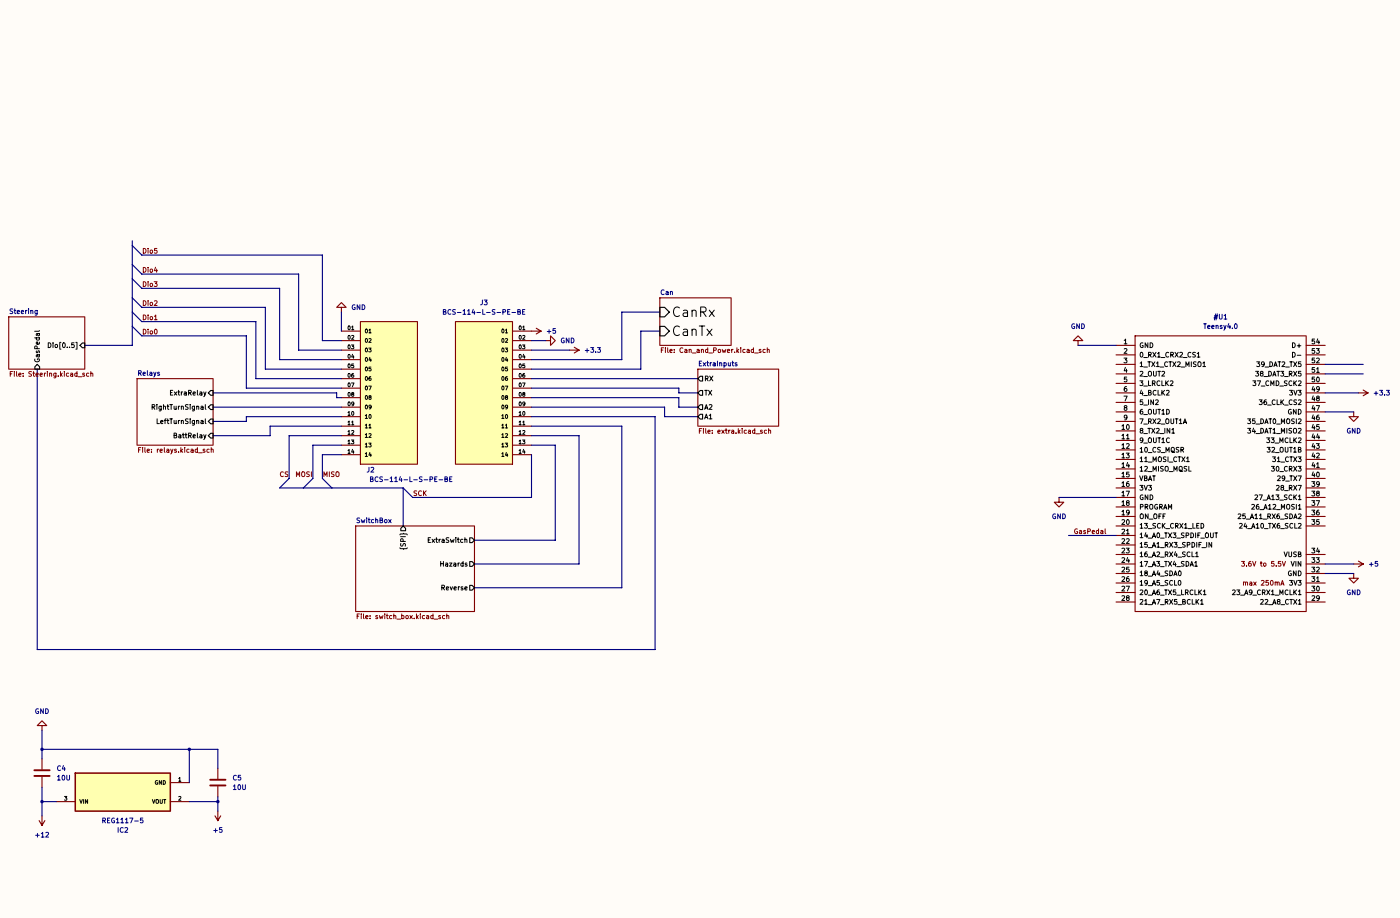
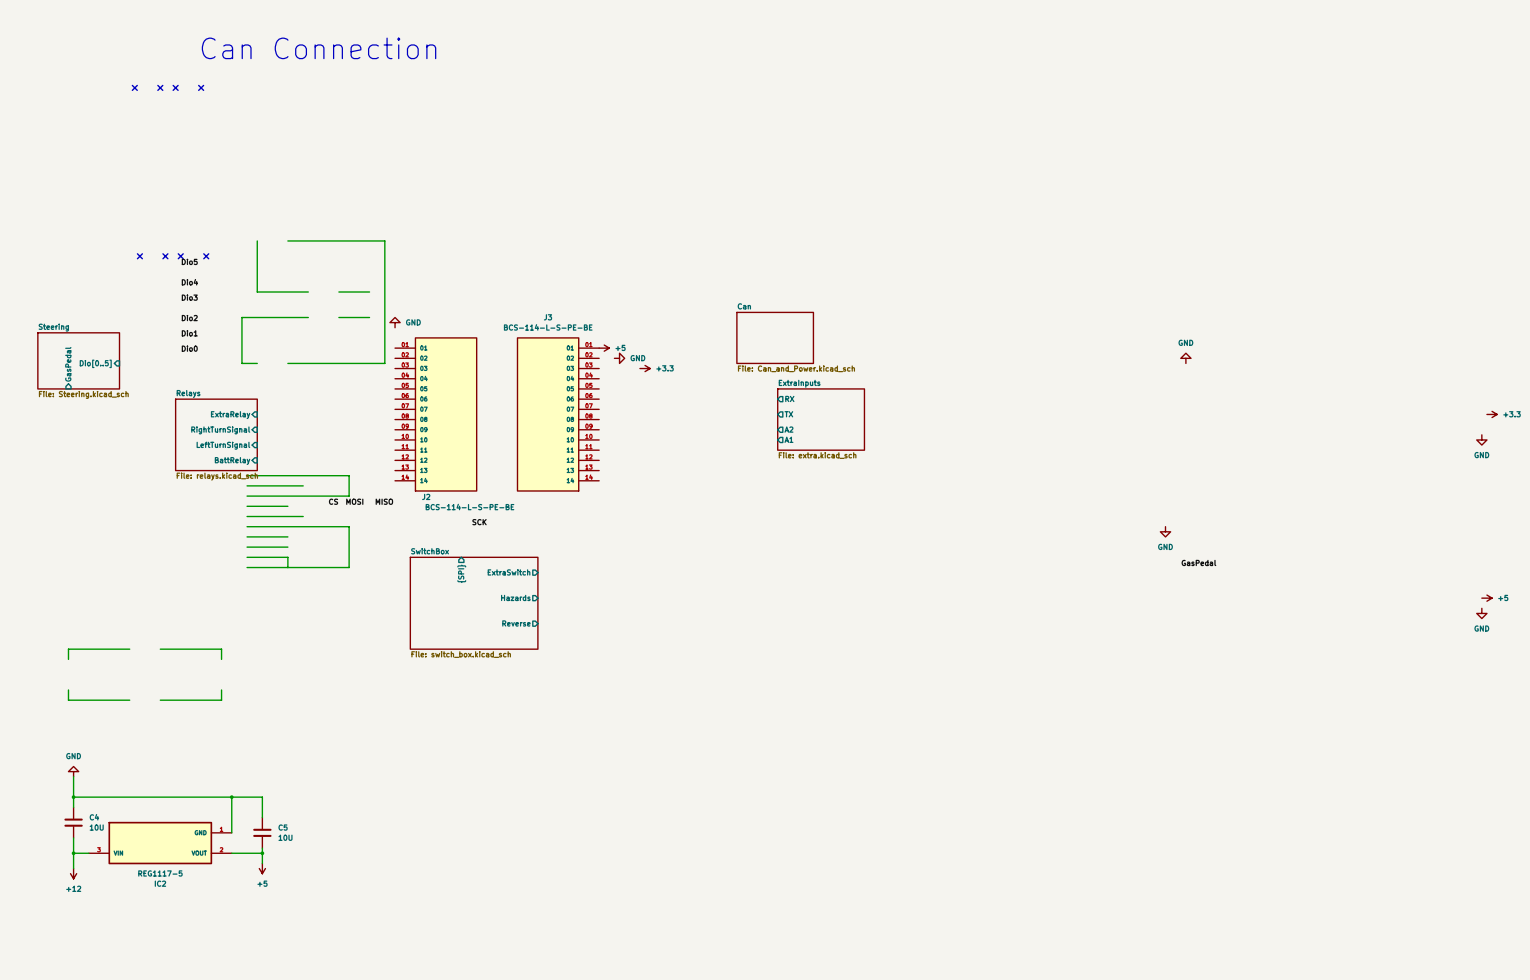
text: none -> Can Connection (319, 48)
no-connect mark: none -> (134, 87)
no-connect mark: none -> (160, 87)
no-connect mark: none -> (175, 87)
no-connect mark: none -> (201, 87)
wire: none -> (257, 240) (257, 292) (308, 292)
wire: none -> (287, 240) (384, 240) (384, 363) (287, 363)
bus: (132, 240) (132, 345) (84, 345) -> none
no-connect mark: none -> (139, 256)
no-connect mark: none -> (165, 256)
wire: (132, 245) (141, 255) (322, 255) (322, 340) (341, 340) -> none
no-connect mark: none -> (180, 256)
no-connect mark: none -> (206, 256)
wire: (132, 264) (141, 274) (298, 274) (298, 350) (341, 350) -> none
wire: (132, 278) (141, 288) (279, 288) (279, 359) (341, 359) -> none
wire: none -> (338, 292) (369, 292)
wire: (132, 297) (141, 307) (265, 307) (265, 369) (341, 369) -> none
wire: none -> (308, 317) (241, 317) (241, 363) (257, 363)
wire: none -> (338, 317) (369, 317)
sheet pin: CanRx (693, 311) -> none
wire: (132, 312) (141, 321) (255, 321) (255, 378) (341, 378) -> none
wire: (341, 312) (341, 331) -> none
wire: (659, 312) (621, 312) (621, 359) (531, 359) -> none
wire: (132, 326) (141, 335) (246, 335) (246, 388) (341, 388) -> none
sheet pin: CanTx (692, 330) -> none
wire: (659, 331) (640, 331) (640, 369) (531, 369) -> none
drawing: [1116, 335, 1326, 612] -> none
wire: (531, 340) (545, 340) -> none
wire: (1078, 345) (1116, 345) -> none
wire: (531, 350) (569, 350) -> none
wire: (1325, 364) (1363, 364) -> none
wire: (37, 369) (37, 611) -> (129, 649) (68, 649)
wire: (1325, 373) (1363, 373) -> none
wire: (531, 378) (697, 378) -> none
wire: (531, 388) (678, 388) (678, 392) (697, 392) -> none
wire: (213, 392) (336, 392) (336, 397) (341, 397) -> none
wire: (1325, 392) (1358, 392) -> none
wire: (531, 397) (678, 397) (678, 407) (697, 407) -> none
wire: (213, 407) (341, 407) -> none
wire: (531, 407) (664, 407) (664, 416) (697, 416) -> none
wire: (1325, 411) (1353, 411) -> none
wire: (341, 416) (246, 416) (246, 421) (213, 421) -> none
wire: (531, 416) (655, 416) (655, 649) (37, 649) (37, 621) -> none
wire: (341, 426) (270, 426) (270, 435) (213, 435) -> none
wire: (531, 426) (621, 426) (621, 587) (474, 587) -> none
wire: (341, 435) (289, 435) (289, 478) (279, 487) -> none
wire: (531, 435) (579, 435) (579, 563) (474, 563) -> none
wire: (341, 445) (312, 445) (312, 478) (303, 487) -> none
wire: (531, 445) (555, 445) (555, 540) (474, 540) -> none
wire: none -> (247, 475) (349, 475) (349, 496) (247, 496)
wire: (341, 454) (322, 454) (322, 478) (331, 487) -> none
wire: (531, 454) (531, 497) (412, 497) (403, 487) -> none
wire: none -> (247, 485) (303, 485)
wire: none -> (247, 506) (287, 506)
wire: none -> (247, 516) (303, 516)
bus: (279, 487) (403, 487) (403, 525) -> none
wire: none -> (247, 526) (349, 526) (349, 567) (247, 567)
wire: (1059, 497) (1116, 497) -> none
wire: none -> (247, 536) (287, 536)
wire: none -> (247, 547) (287, 547)
wire: none -> (247, 557) (287, 557) (287, 567)
wire: (1068, 535) (1116, 535) -> none
wire: (1325, 563) (1353, 563) -> none
wire: (1325, 573) (1353, 573) -> none
wire: none -> (160, 649) (221, 649) (221, 659)
wire: none -> (68, 689) (68, 700) (129, 700)
wire: none -> (221, 689) (221, 700) (160, 700)

